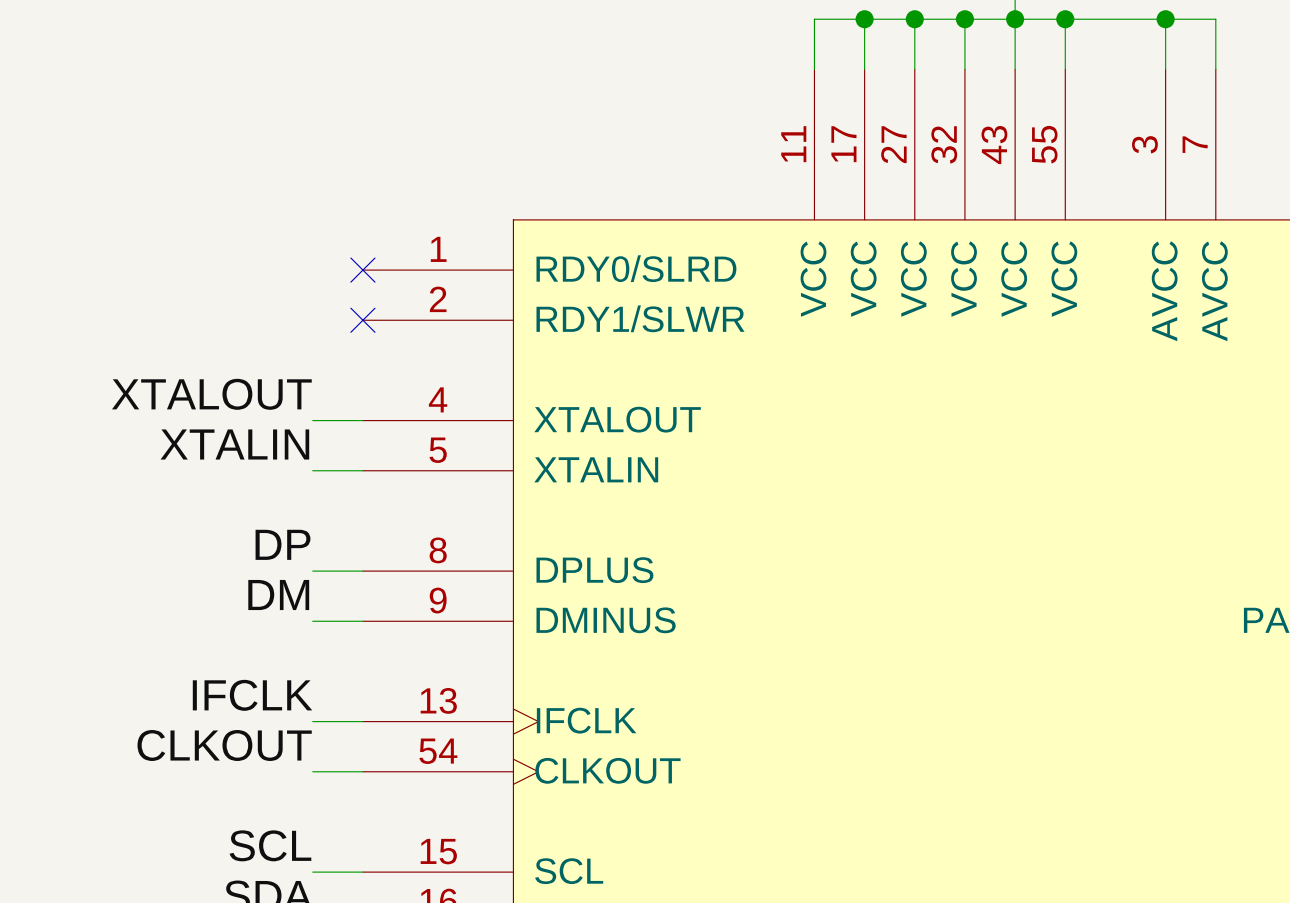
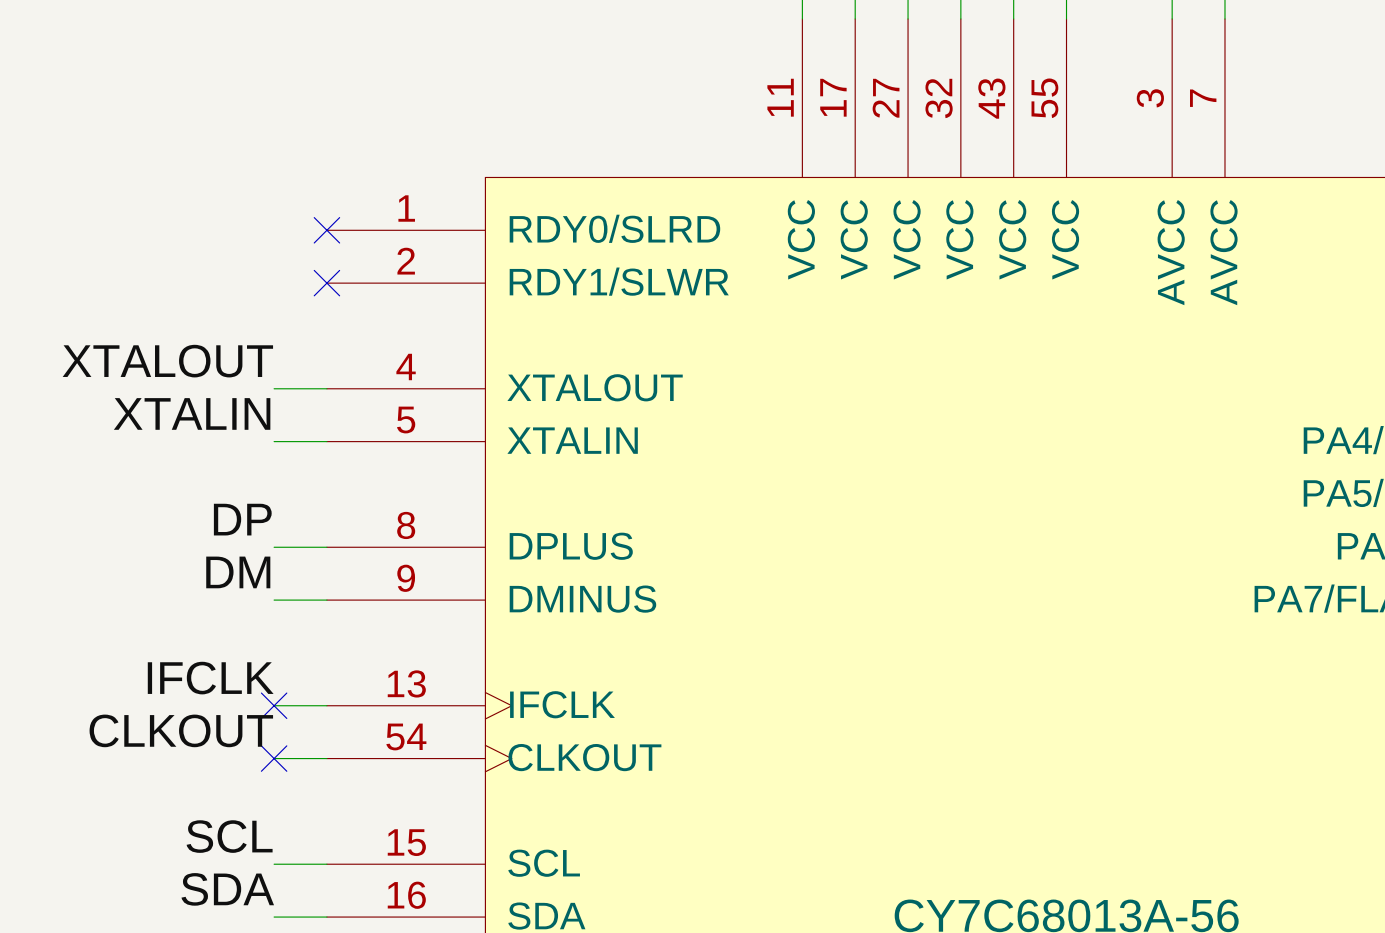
no-connect mark: none -> (274, 705)
no-connect mark: none -> (274, 758)

